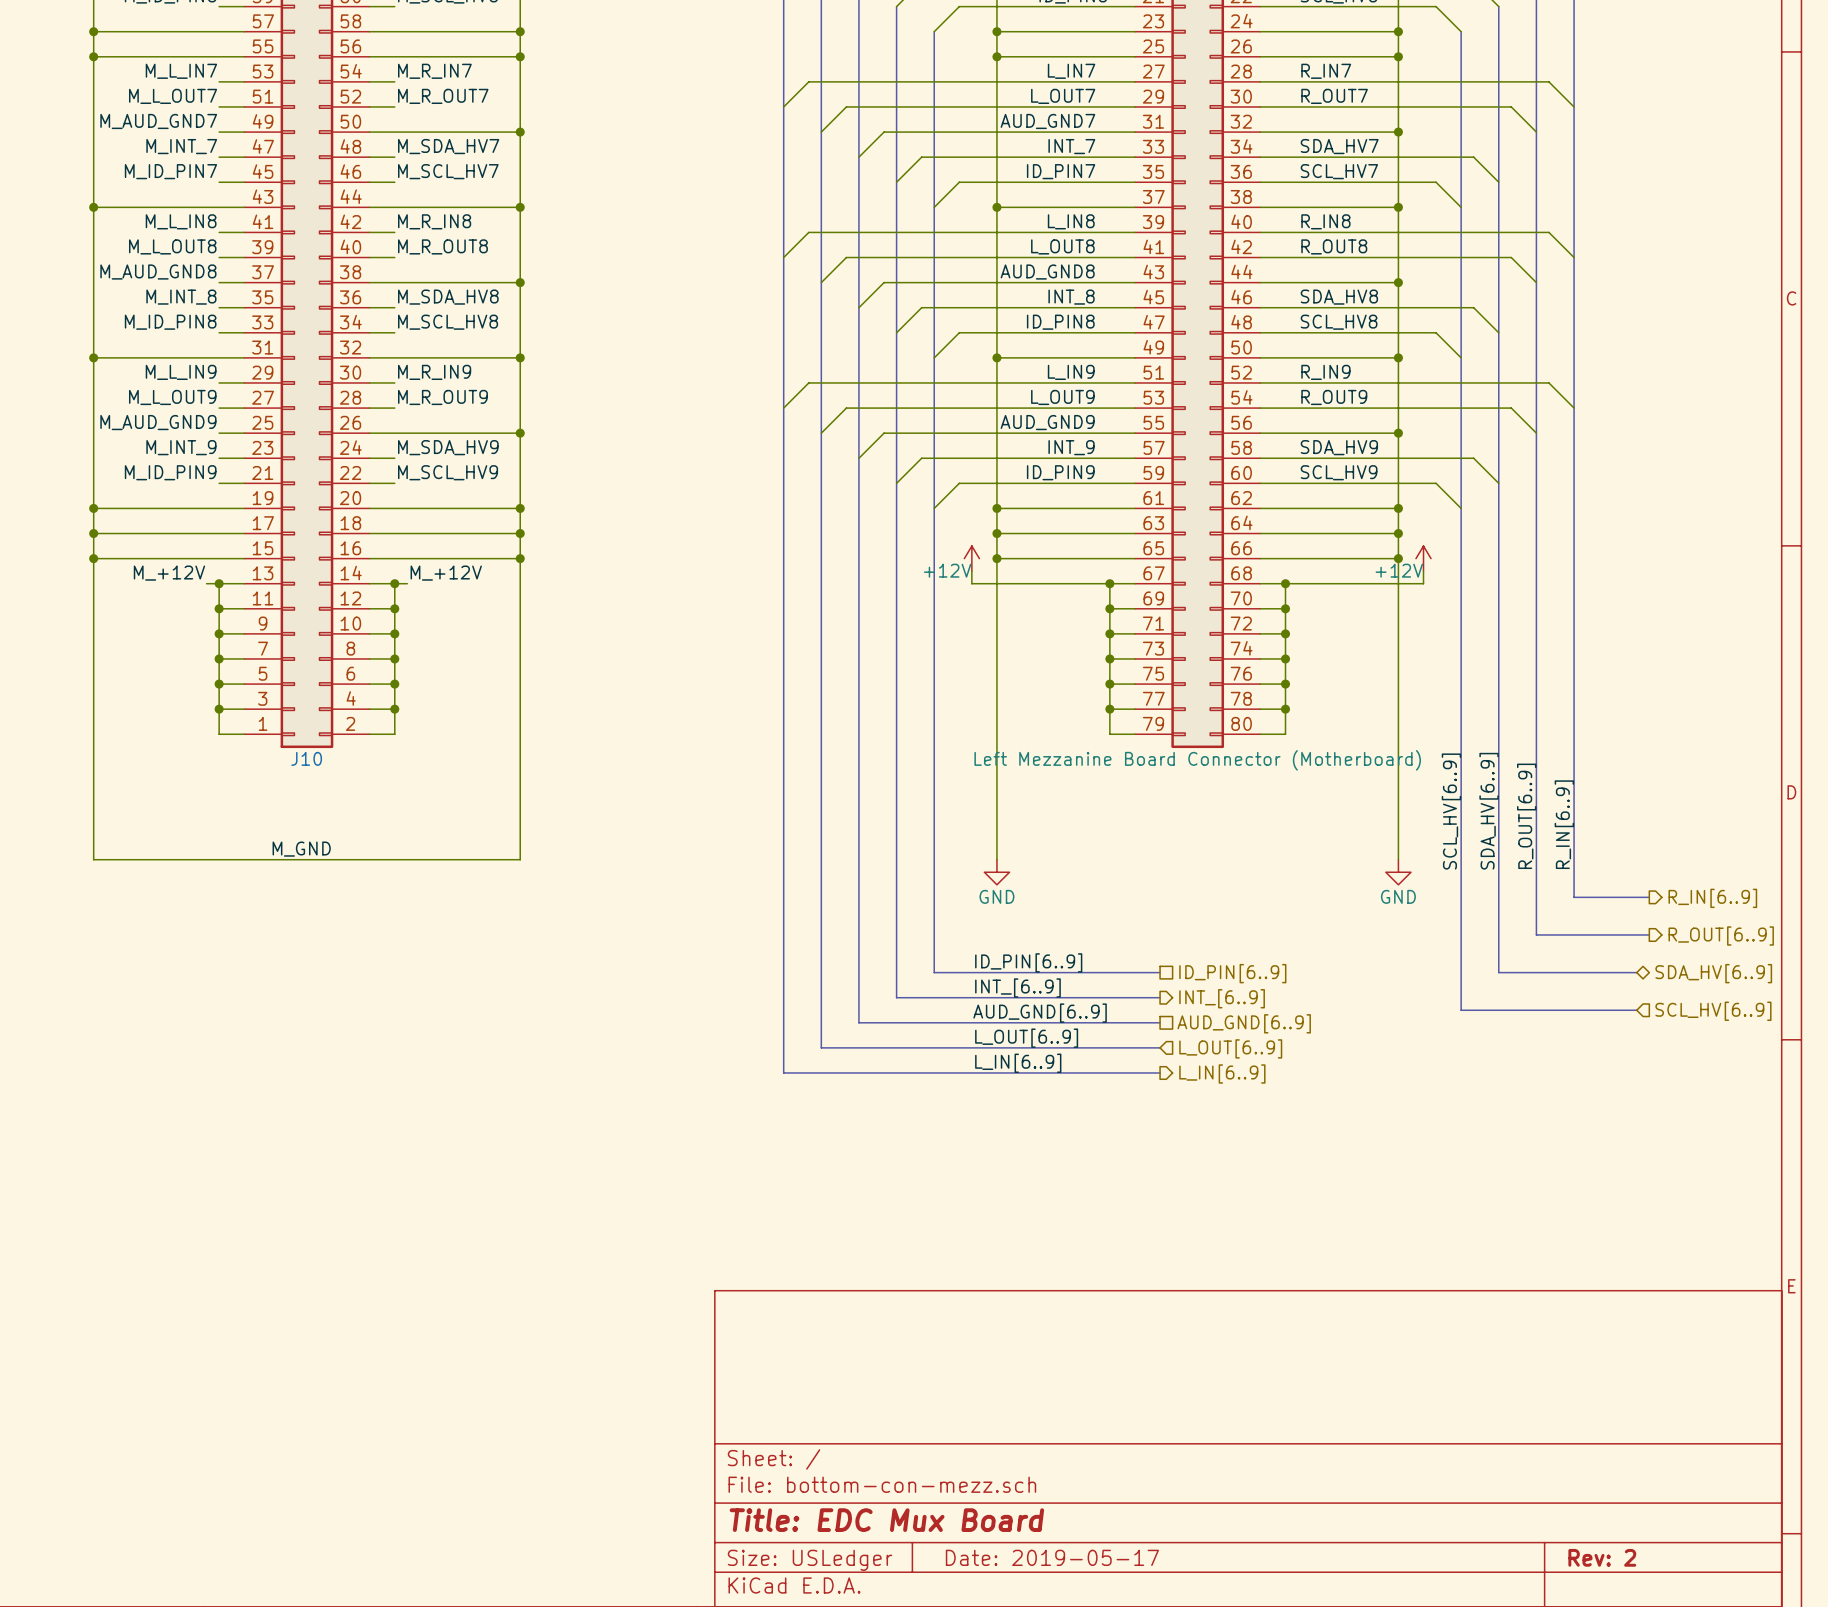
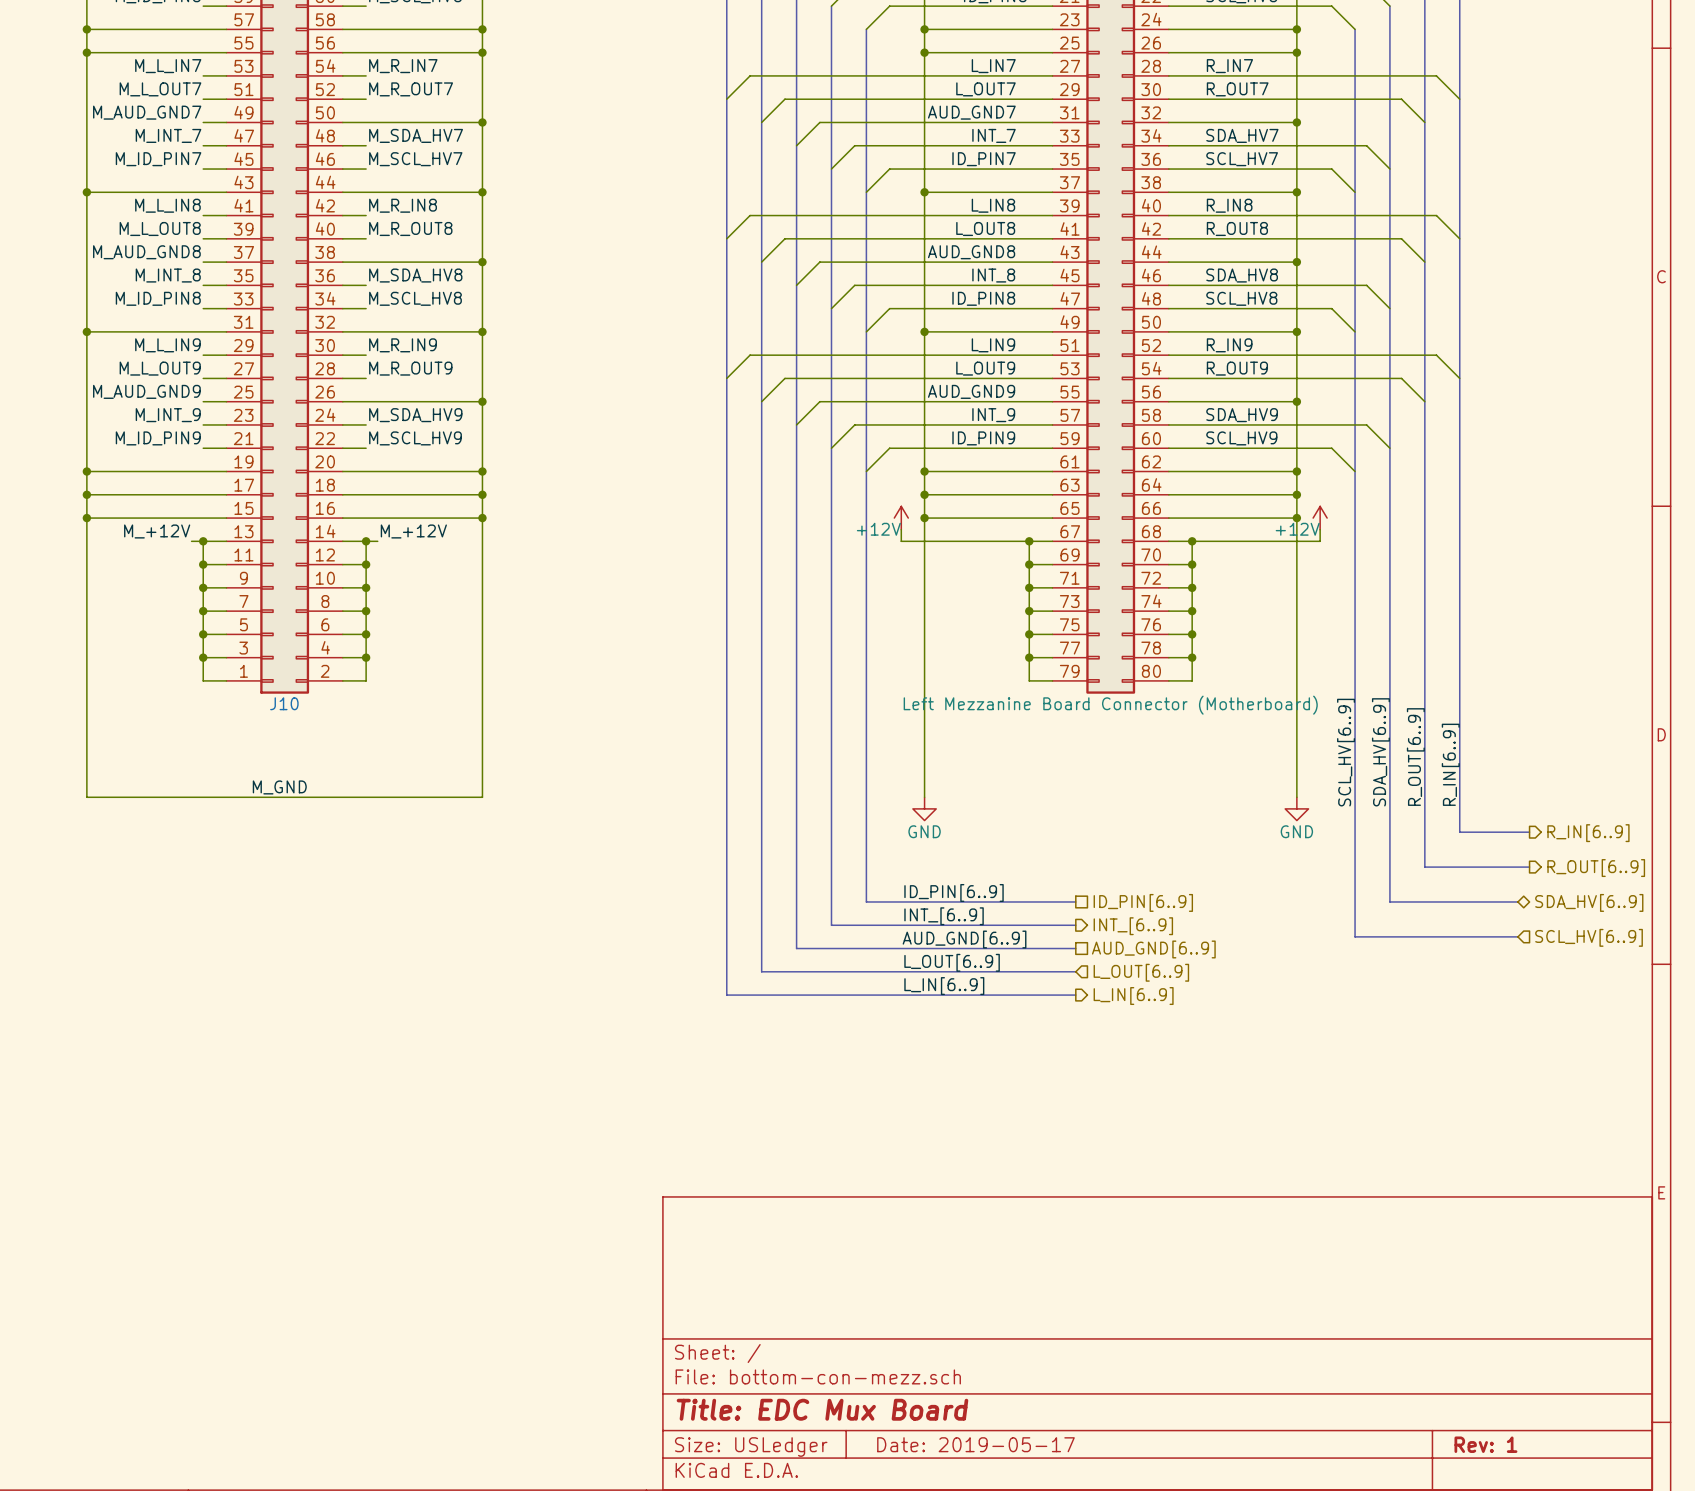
title block: Rev: 2 (1602, 1557) -> Rev: 1 (1485, 1444)

